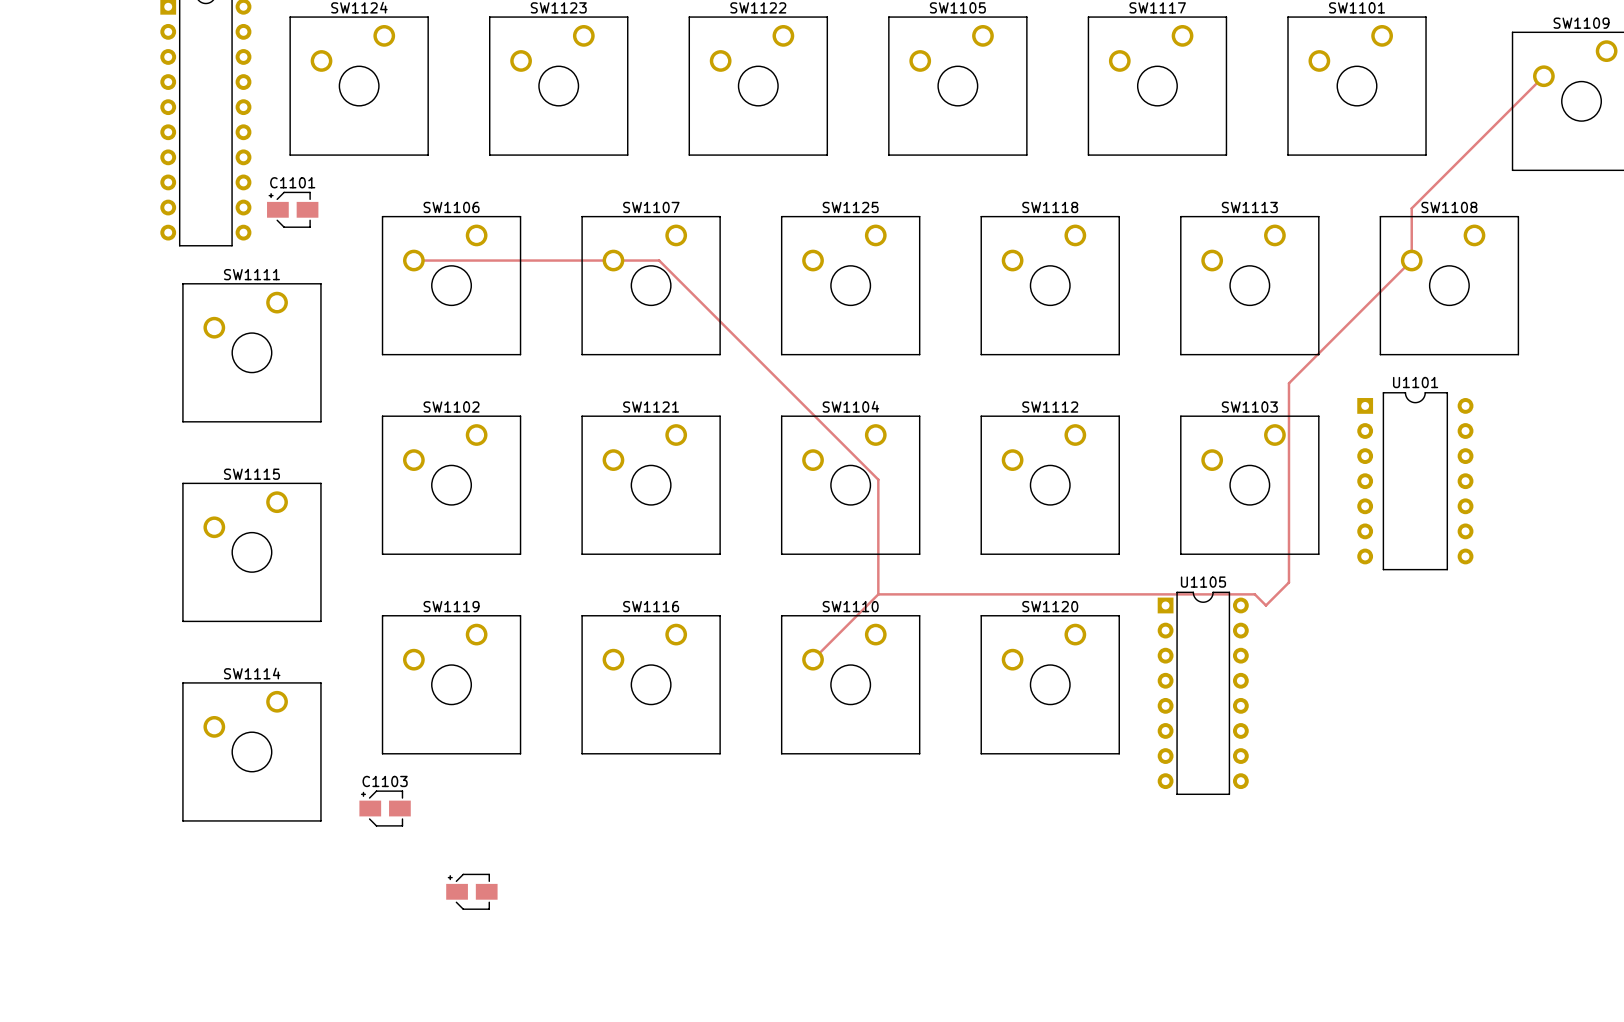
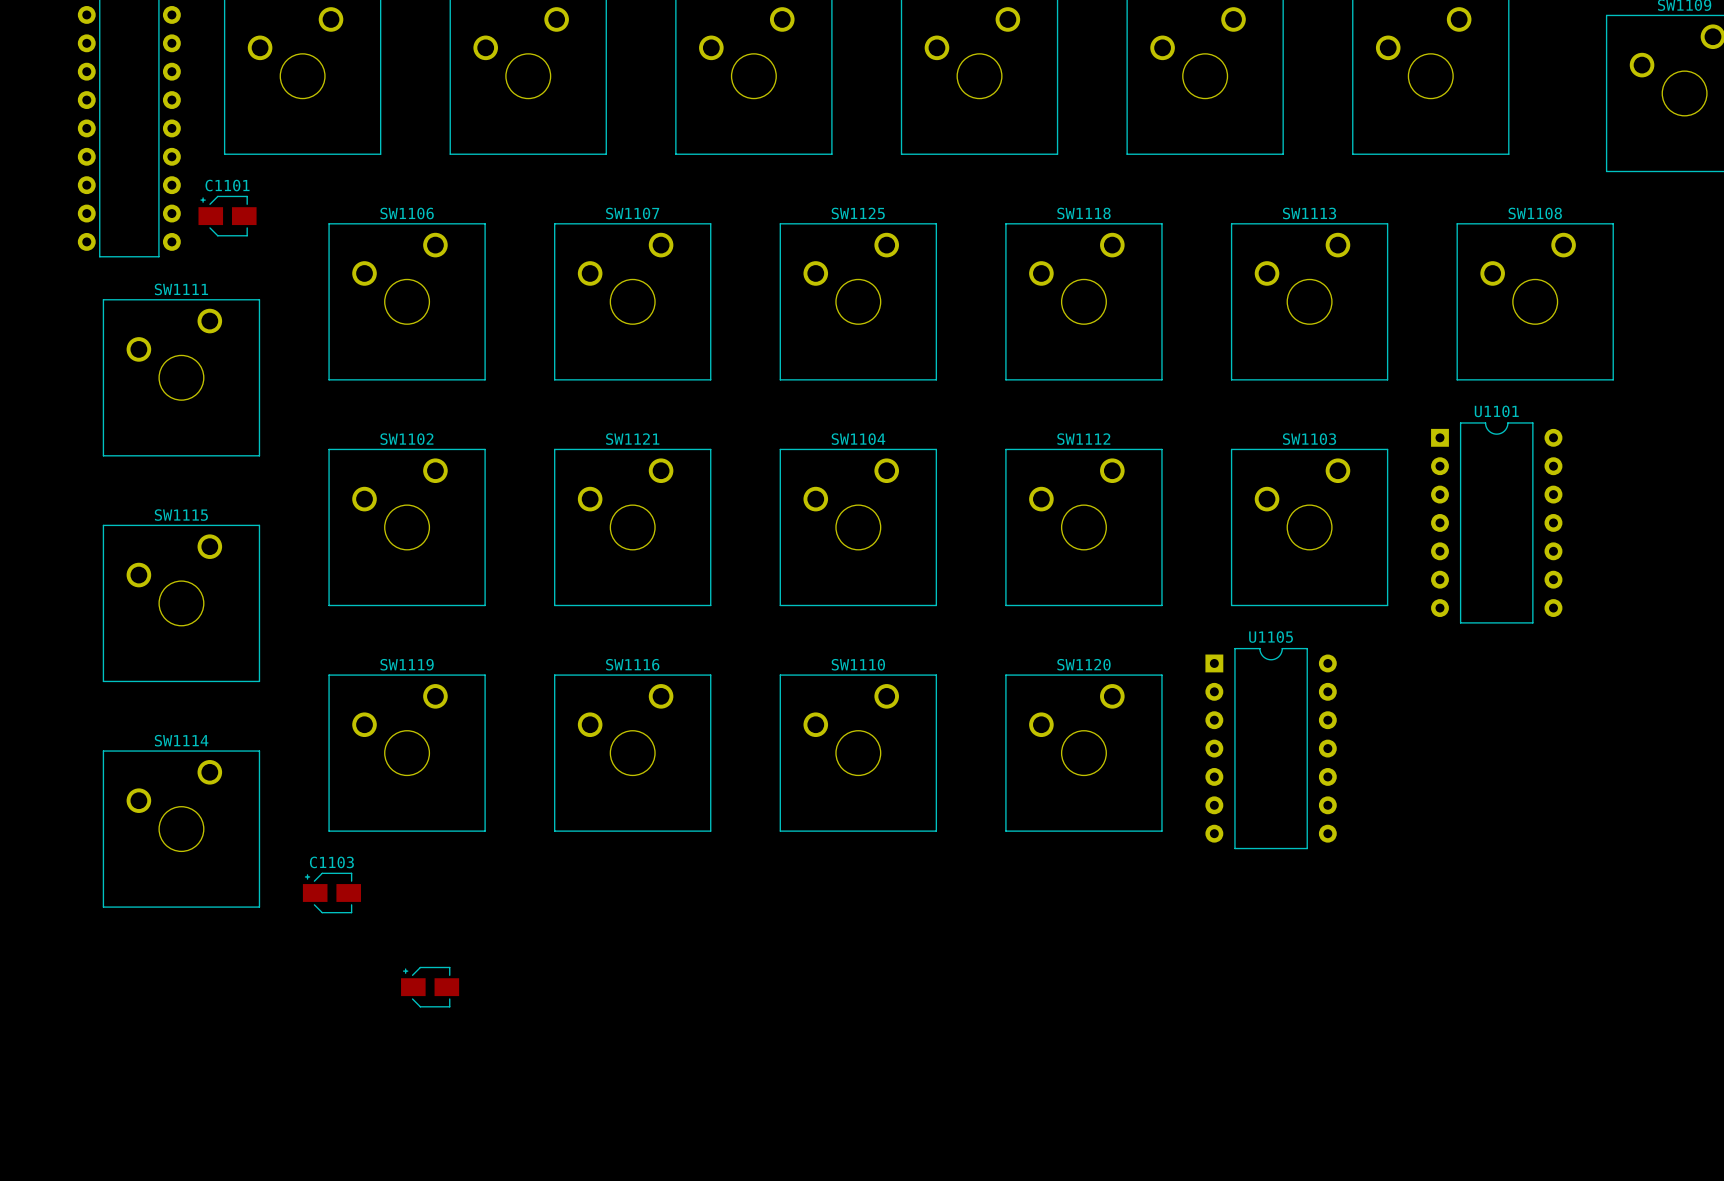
track: (1543, 76) (1411, 208) (1411, 260) (1288, 383) (1288, 582) (1265, 605) (1254, 594) (878, 594) -> none
track: (413, 260) (659, 260) (878, 479) (878, 594) -> none
U1105 footprint: [1157, 591, 1249, 795] -> [1205, 647, 1337, 850]
track: (878, 594) (813, 659) -> none

